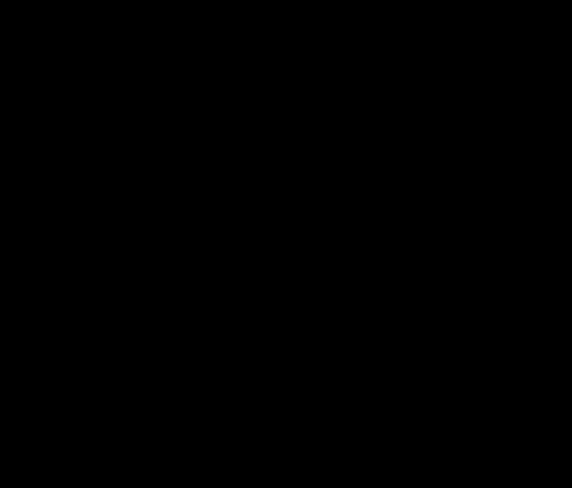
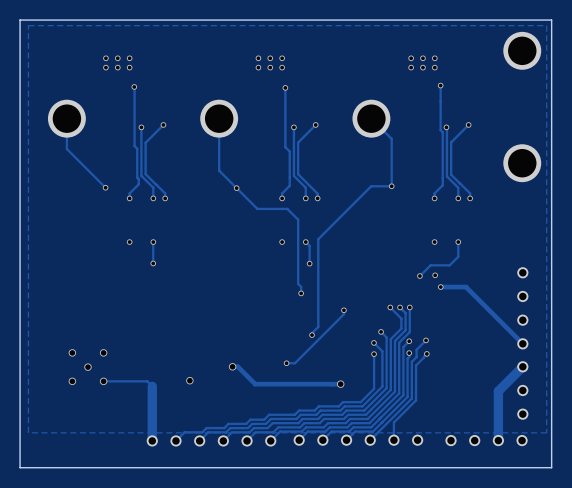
board edge: none -> (551, 20) (551, 467) (20, 467) (20, 20) (551, 20)
zone outline: none -> (546, 25) (546, 432) (28, 432) (28, 25) (546, 25)
part: none -> (522, 50)
via: none -> (105, 58)
via: none -> (117, 58)
via: none -> (129, 58)
via: none -> (258, 58)
via: none -> (270, 58)
via: none -> (282, 58)
via: none -> (411, 58)
via: none -> (422, 58)
via: none -> (434, 58)
via: none -> (105, 67)
via: none -> (117, 67)
via: none -> (129, 67)
via: none -> (258, 67)
via: none -> (270, 67)
via: none -> (282, 67)
via: none -> (411, 67)
via: none -> (422, 67)
via: none -> (434, 67)
track: none -> (440, 85) (442, 185) (434, 193) (434, 198)
via: none -> (440, 85)
track: none -> (134, 86) (134, 146) (137, 148) (138, 184) (129, 193) (129, 198)
via: none -> (134, 86)
track: none -> (285, 87) (285, 147) (289, 151) (289, 185) (282, 193) (282, 198)
via: none -> (285, 87)
track: none -> (66, 118) (66, 149) (105, 187)
part: none -> (66, 118)
track: none -> (219, 118) (219, 170) (257, 208) (287, 208) (298, 219) (298, 283) (301, 286) (301, 293)
part: none -> (219, 118)
track: none -> (371, 118) (391, 138) (391, 186) (371, 186) (318, 239) (318, 326) (312, 335)
part: none -> (371, 118)
track: none -> (163, 124) (145, 142) (145, 174) (165, 193) (165, 198)
via: none -> (163, 124)
track: none -> (315, 124) (298, 142) (298, 174) (317, 193) (317, 198)
via: none -> (315, 124)
track: none -> (468, 124) (451, 142) (451, 174) (470, 193) (470, 198)
via: none -> (468, 124)
track: none -> (141, 127) (141, 175) (153, 187) (153, 198)
via: none -> (141, 127)
track: none -> (293, 127) (293, 175) (305, 187) (305, 198)
via: none -> (293, 127)
track: none -> (446, 127) (446, 176) (458, 187) (458, 198)
via: none -> (446, 127)
part: none -> (522, 163)
via: none -> (391, 186)
via: none -> (105, 187)
via: none -> (236, 188)
via: none -> (129, 198)
via: none -> (153, 198)
via: none -> (165, 198)
via: none -> (282, 198)
via: none -> (305, 198)
via: none -> (317, 198)
via: none -> (434, 198)
via: none -> (458, 198)
via: none -> (470, 198)
via: none -> (129, 242)
track: none -> (153, 242) (153, 263)
via: none -> (153, 242)
via: none -> (282, 242)
track: none -> (305, 242) (309, 245) (309, 263)
via: none -> (305, 242)
via: none -> (434, 242)
track: none -> (458, 242) (458, 256) (449, 265) (430, 265) (419, 276)
via: none -> (458, 242)
via: none -> (153, 263)
via: none -> (309, 263)
via: none -> (435, 275)
via: none -> (419, 276)
track: none -> (440, 287) (466, 287) (522, 343)
via: none -> (440, 287)
via: none -> (301, 293)
track: none -> (390, 307) (401, 318) (401, 328) (390, 339) (390, 389) (365, 414) (348, 414) (344, 418) (324, 418) (319, 423) (304, 423) (300, 427) (278, 427) (273, 432) (255, 432) (247, 440)
via: none -> (390, 307)
track: none -> (400, 307) (405, 312) (405, 330) (395, 340) (395, 391) (367, 418) (349, 418) (345, 423) (328, 423) (323, 427) (306, 427) (301, 431) (280, 431) (270, 440)
via: none -> (400, 307)
track: none -> (409, 307) (409, 332) (399, 342) (399, 393) (369, 423) (351, 423) (347, 427) (329, 427) (325, 431) (307, 431) (299, 440)
via: none -> (409, 307)
part: none -> (522, 308)
track: none -> (343, 310) (343, 314) (294, 363) (286, 363)
via: none -> (343, 310)
track: none -> (381, 331) (386, 337) (386, 388) (364, 410) (346, 410) (342, 414) (322, 414) (318, 418) (302, 418) (298, 423) (272, 423) (267, 428) (253, 428) (249, 432) (231, 432) (223, 440)
via: none -> (381, 331)
via: none -> (312, 335)
track: none -> (426, 340) (416, 349) (416, 357) (411, 361) (411, 398) (370, 440)
via: none -> (426, 340)
track: none -> (409, 341) (403, 347) (403, 395) (371, 427) (353, 427) (349, 431) (331, 431) (322, 440)
via: none -> (409, 341)
track: none -> (373, 342) (382, 351) (382, 386) (362, 406) (344, 406) (340, 410) (320, 410) (316, 414) (300, 414) (296, 418) (270, 418) (265, 423) (252, 423) (248, 428) (230, 428) (226, 432) (208, 432) (199, 440)
via: none -> (373, 342)
via: none -> (72, 352)
via: none -> (103, 352)
track: none -> (409, 353) (407, 396) (372, 431) (355, 431) (346, 440)
via: none -> (409, 353)
track: none -> (426, 353) (416, 365) (416, 400) (393, 422) (393, 440)
via: none -> (426, 353)
track: none -> (374, 354) (374, 388) (360, 402) (343, 402) (338, 406) (318, 406) (314, 410) (299, 410) (294, 414) (269, 414) (264, 419) (250, 419) (246, 423) (228, 423) (224, 428) (206, 428) (202, 432) (184, 432) (175, 440)
via: none -> (374, 354)
via: none -> (286, 363)
track: none -> (232, 366) (237, 366) (255, 384) (340, 384)
via: none -> (232, 366)
track: none -> (522, 366) (498, 391) (498, 440)
via: none -> (87, 367)
via: none -> (189, 380)
via: none -> (72, 381)
track: none -> (103, 381) (147, 381) (152, 386) (152, 440)
via: none -> (103, 381)
via: none -> (340, 384)
part: none -> (522, 390)
part: none -> (211, 440)
part: none -> (358, 440)
part: none -> (486, 440)

